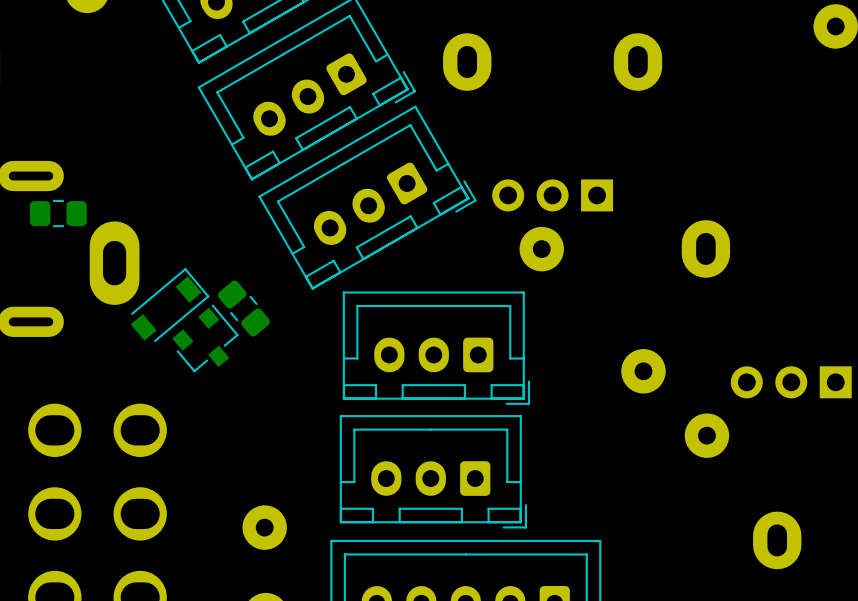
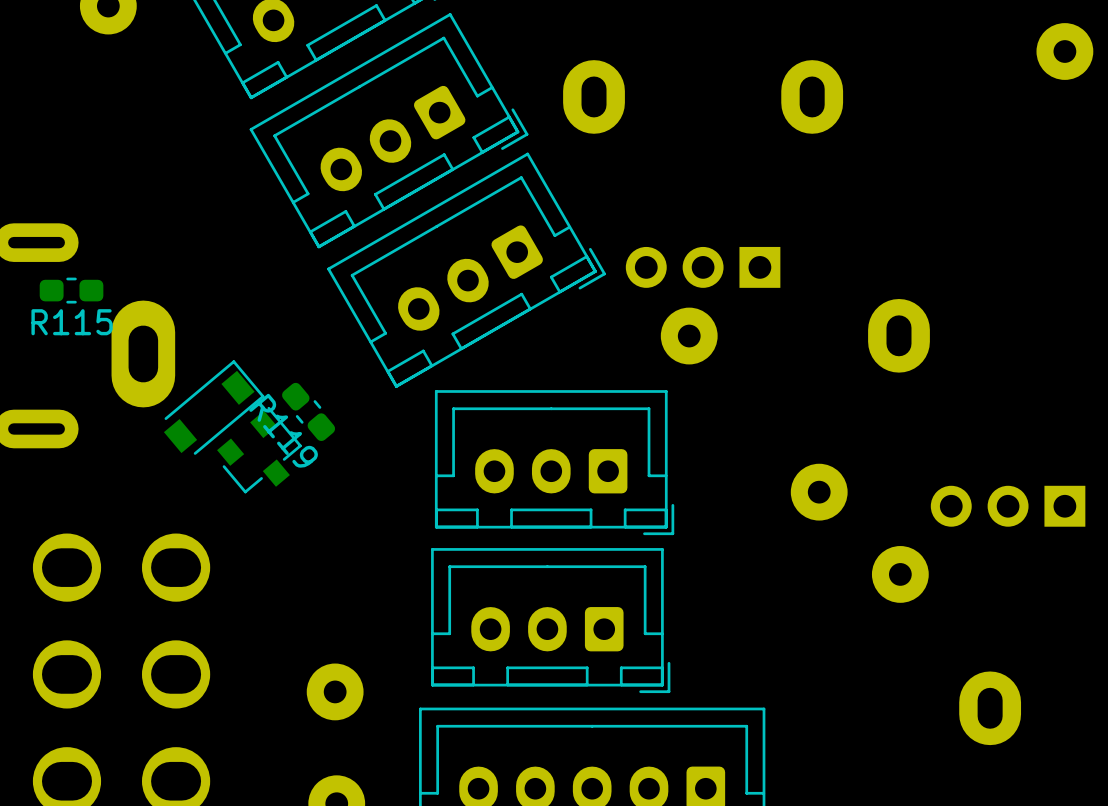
part: (58, 213) -> none
R115: none -> (71, 290)
part: (243, 308) -> none
R119: none -> (308, 411)

